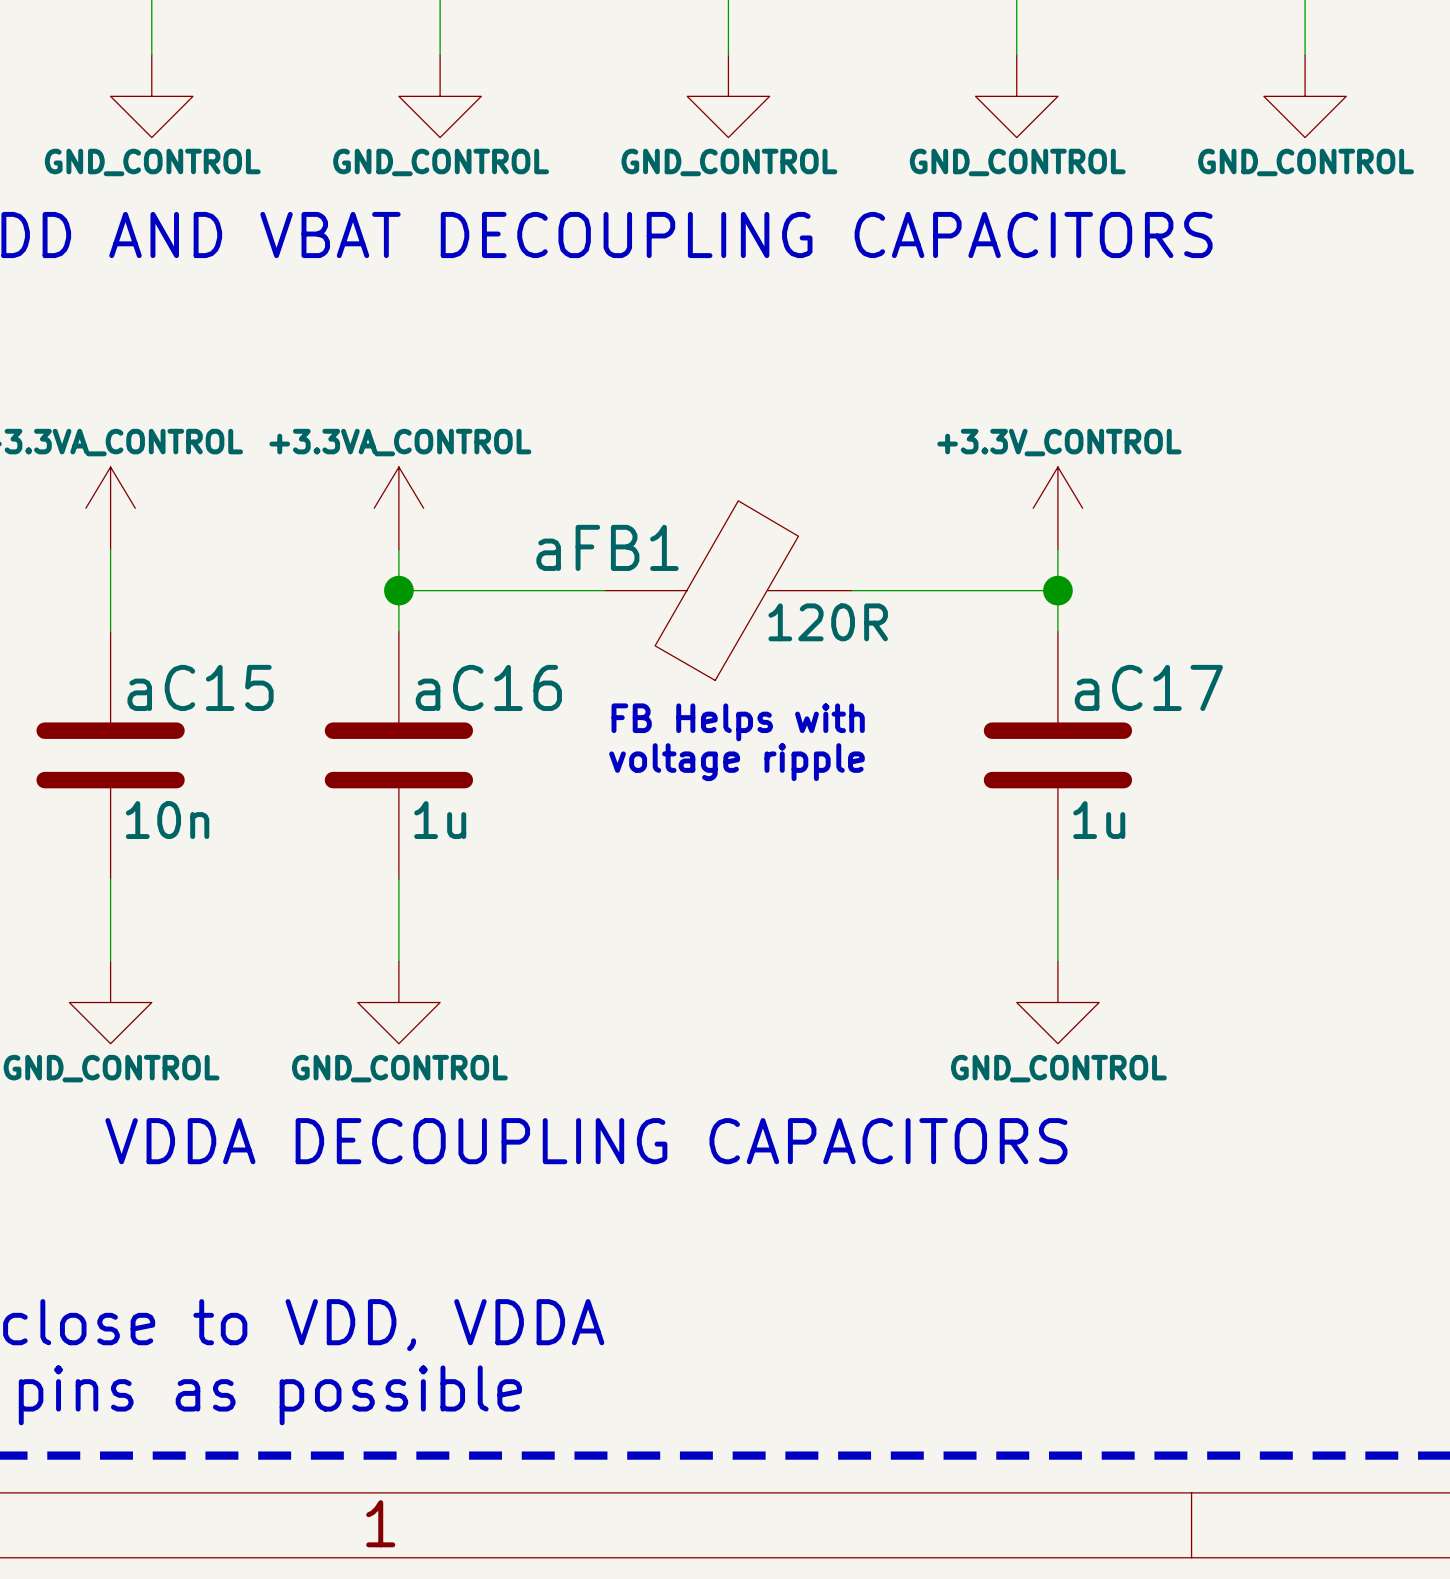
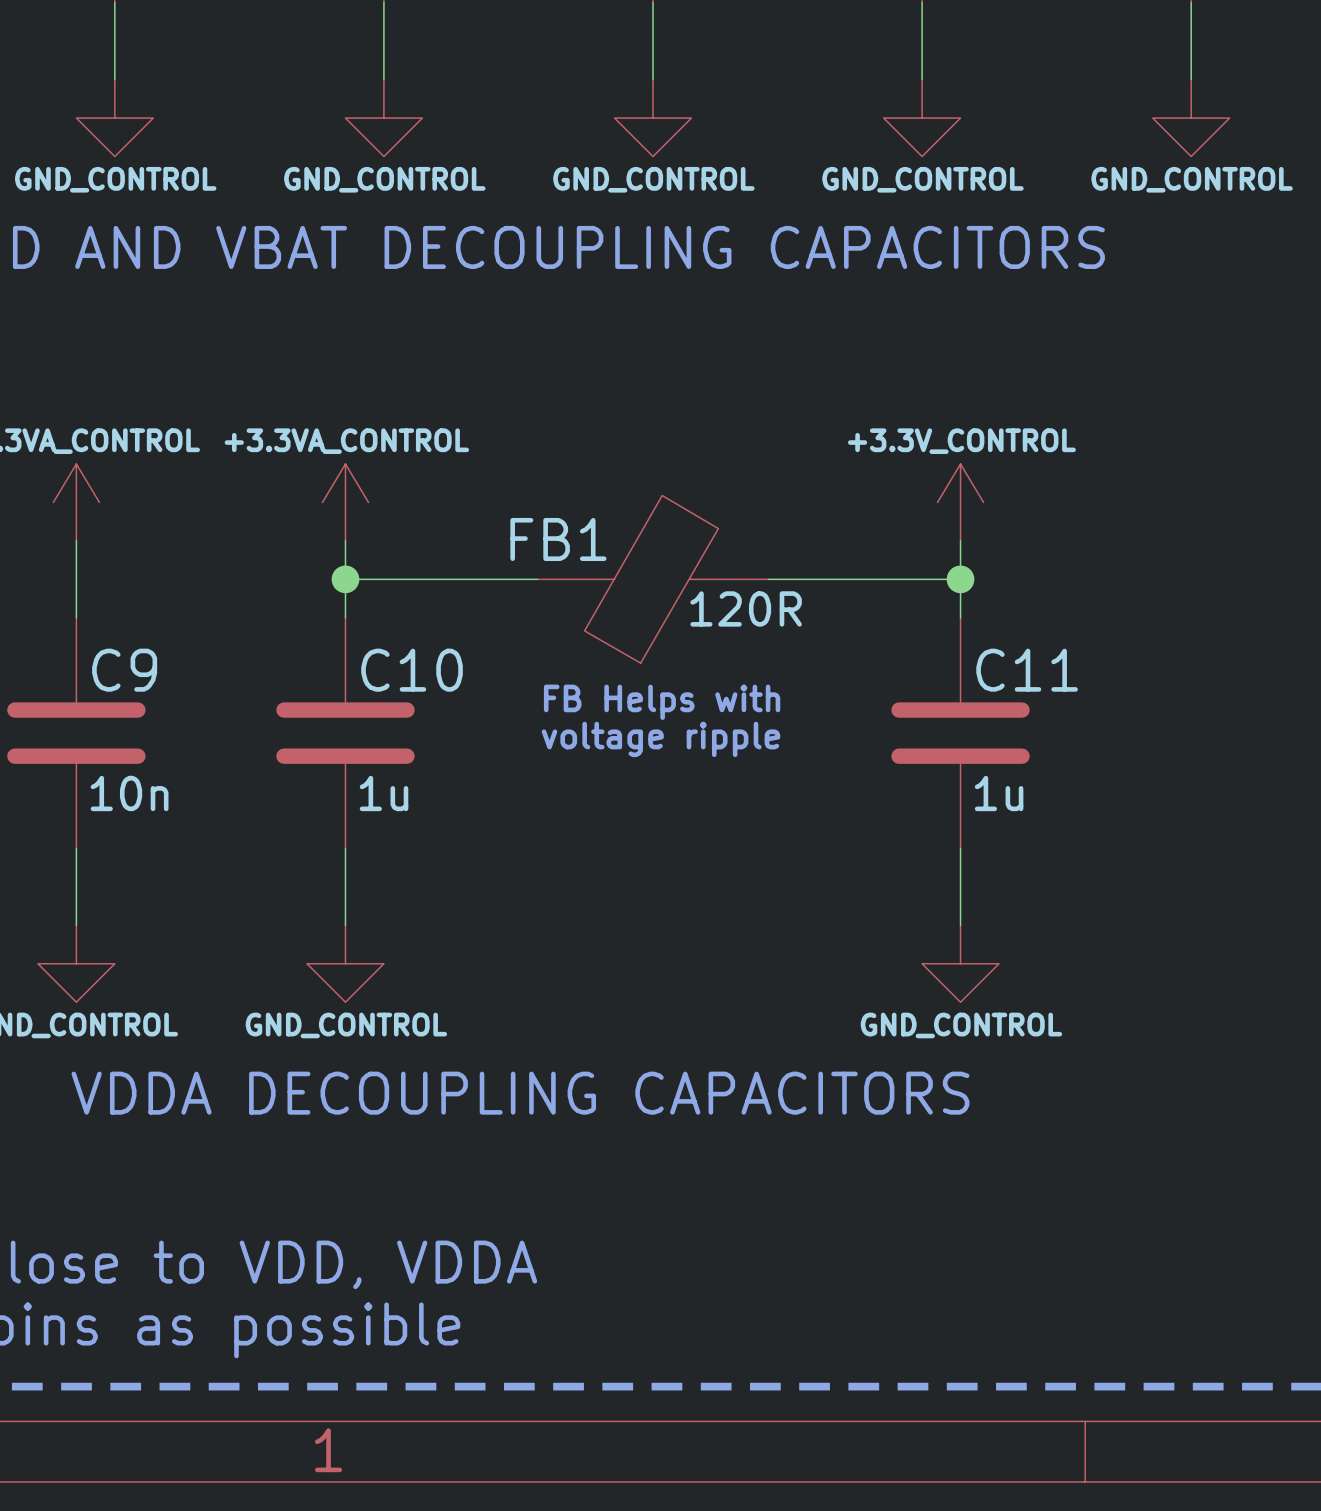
aFB1 name: aFB1 (607, 547) -> FB1 (558, 539)
aC15 name: aC15 (200, 687) -> C9 (124, 670)
aC16 name: aC16 (488, 687) -> C10 (412, 670)
aC17 name: aC17 (1148, 687) -> C11 (1027, 670)

